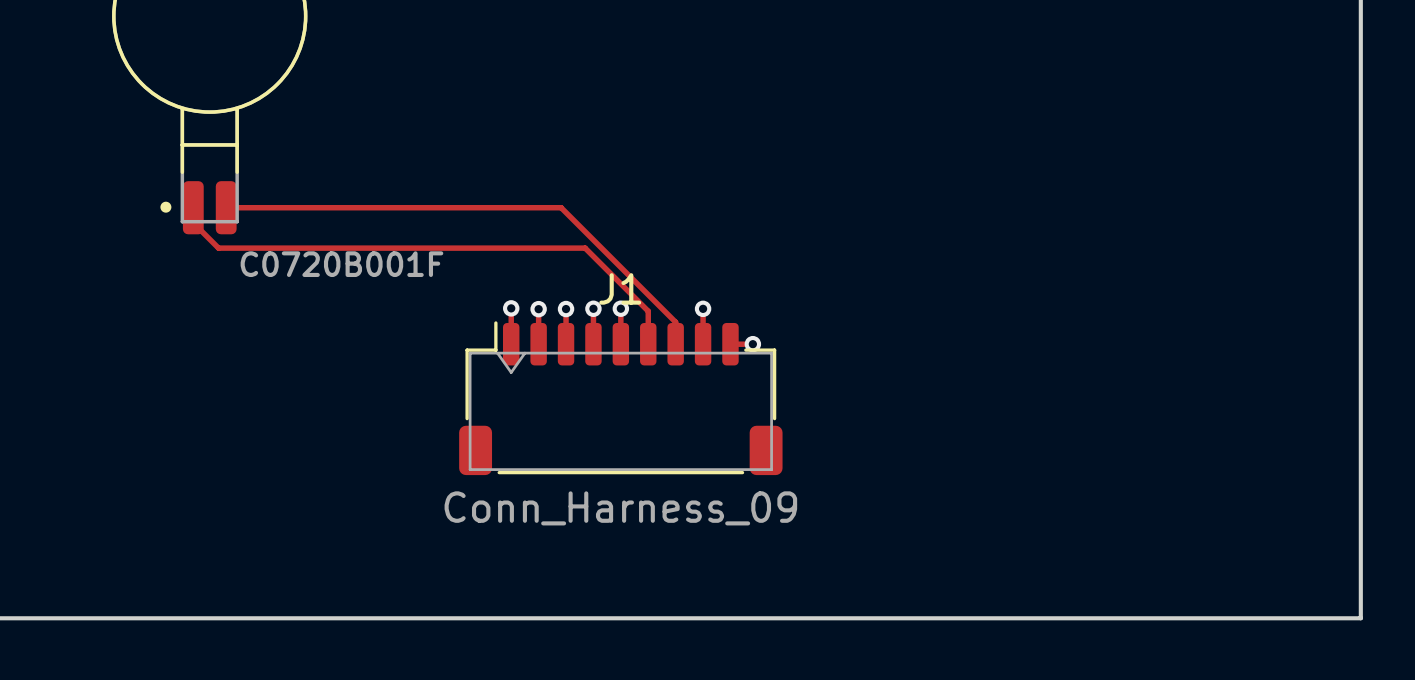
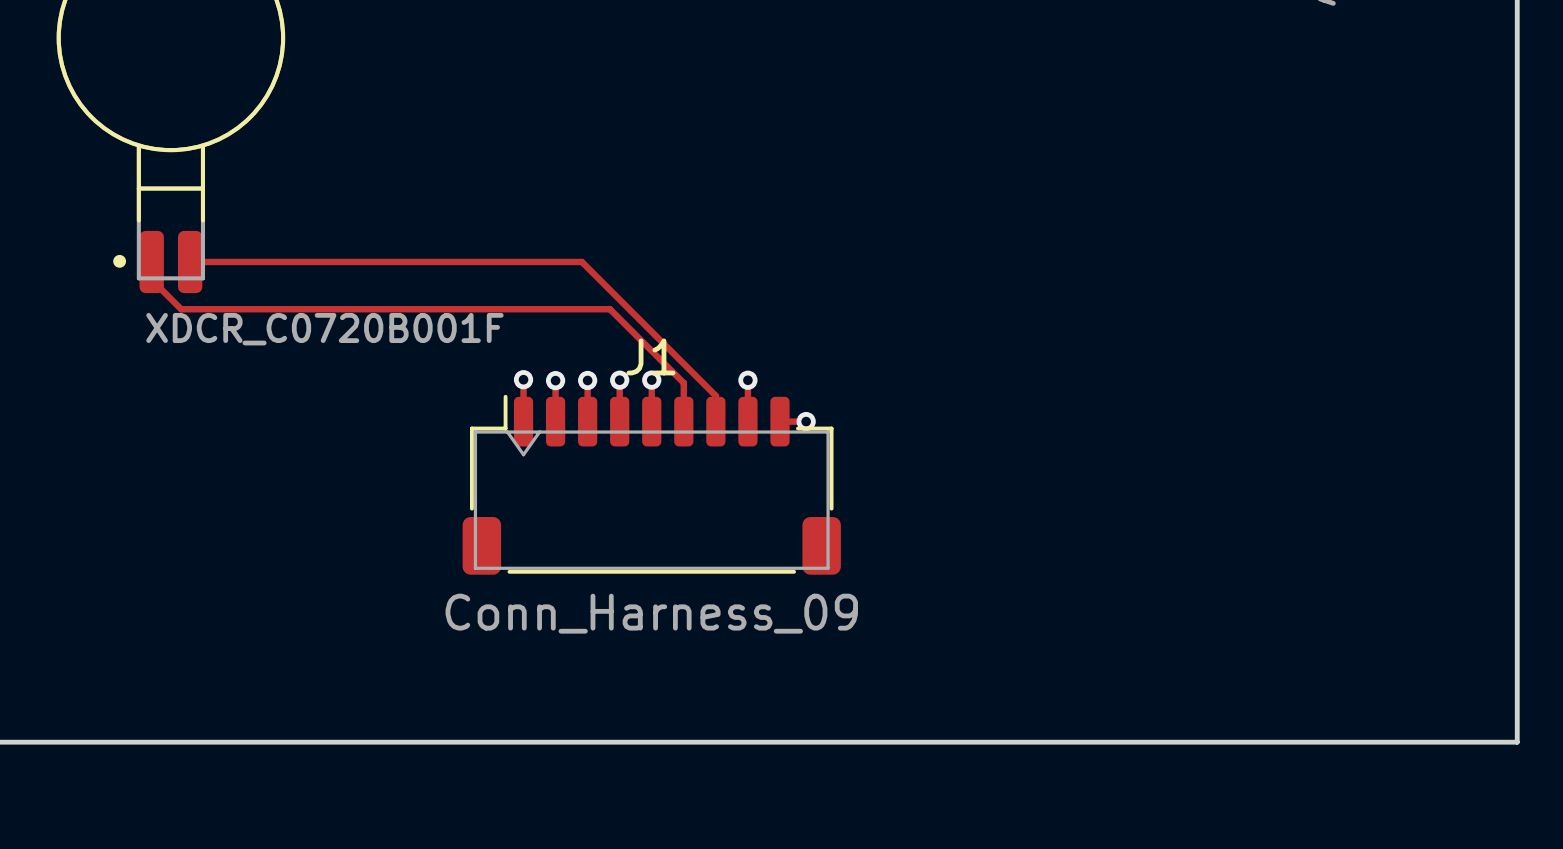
part value: C0720B001F (341, 264) -> XDCR_C0720B001F (324, 329)

